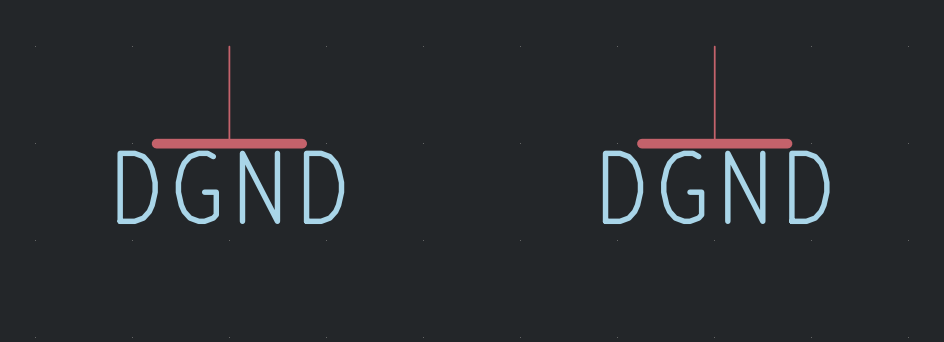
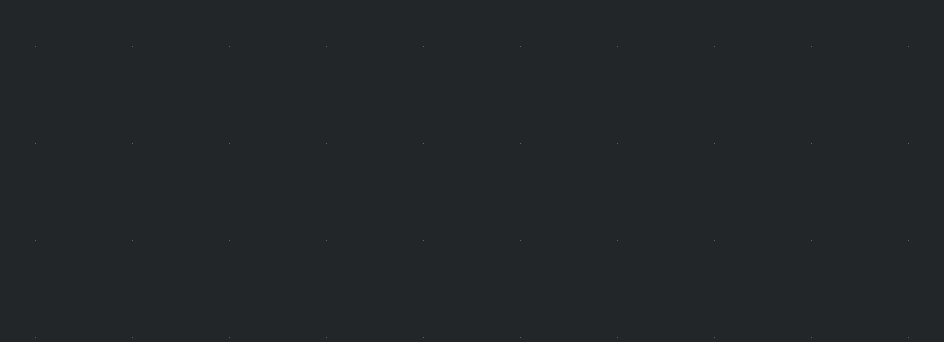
power symbol: DGND (229, 97) -> none
power symbol: DGND (714, 97) -> none

